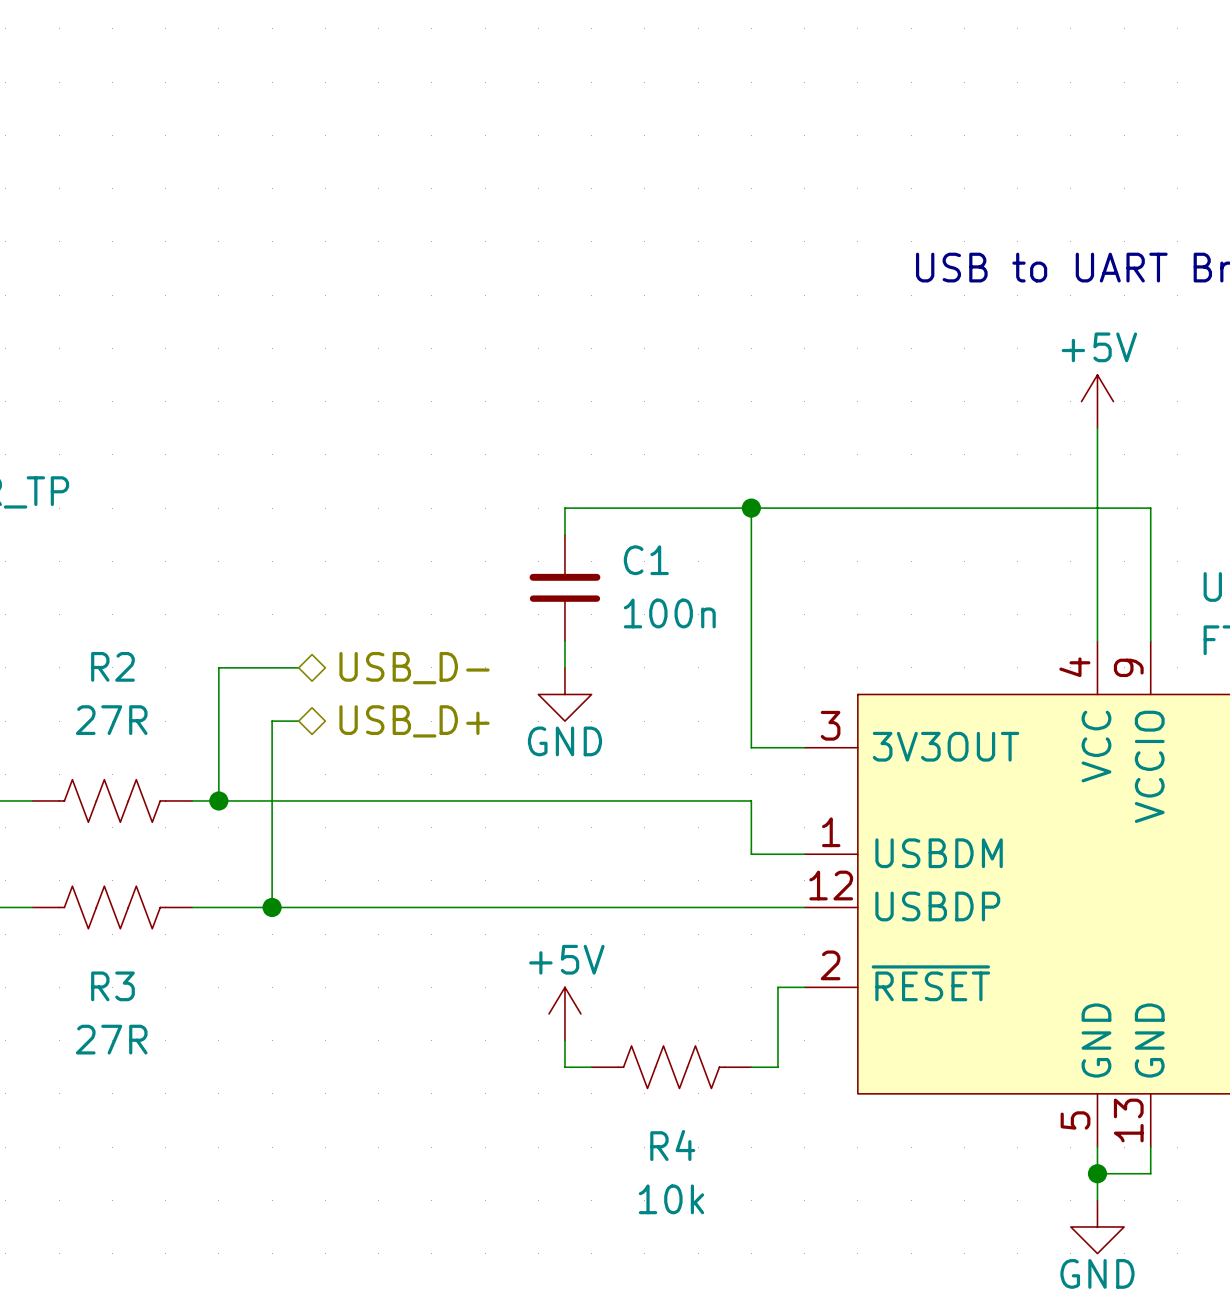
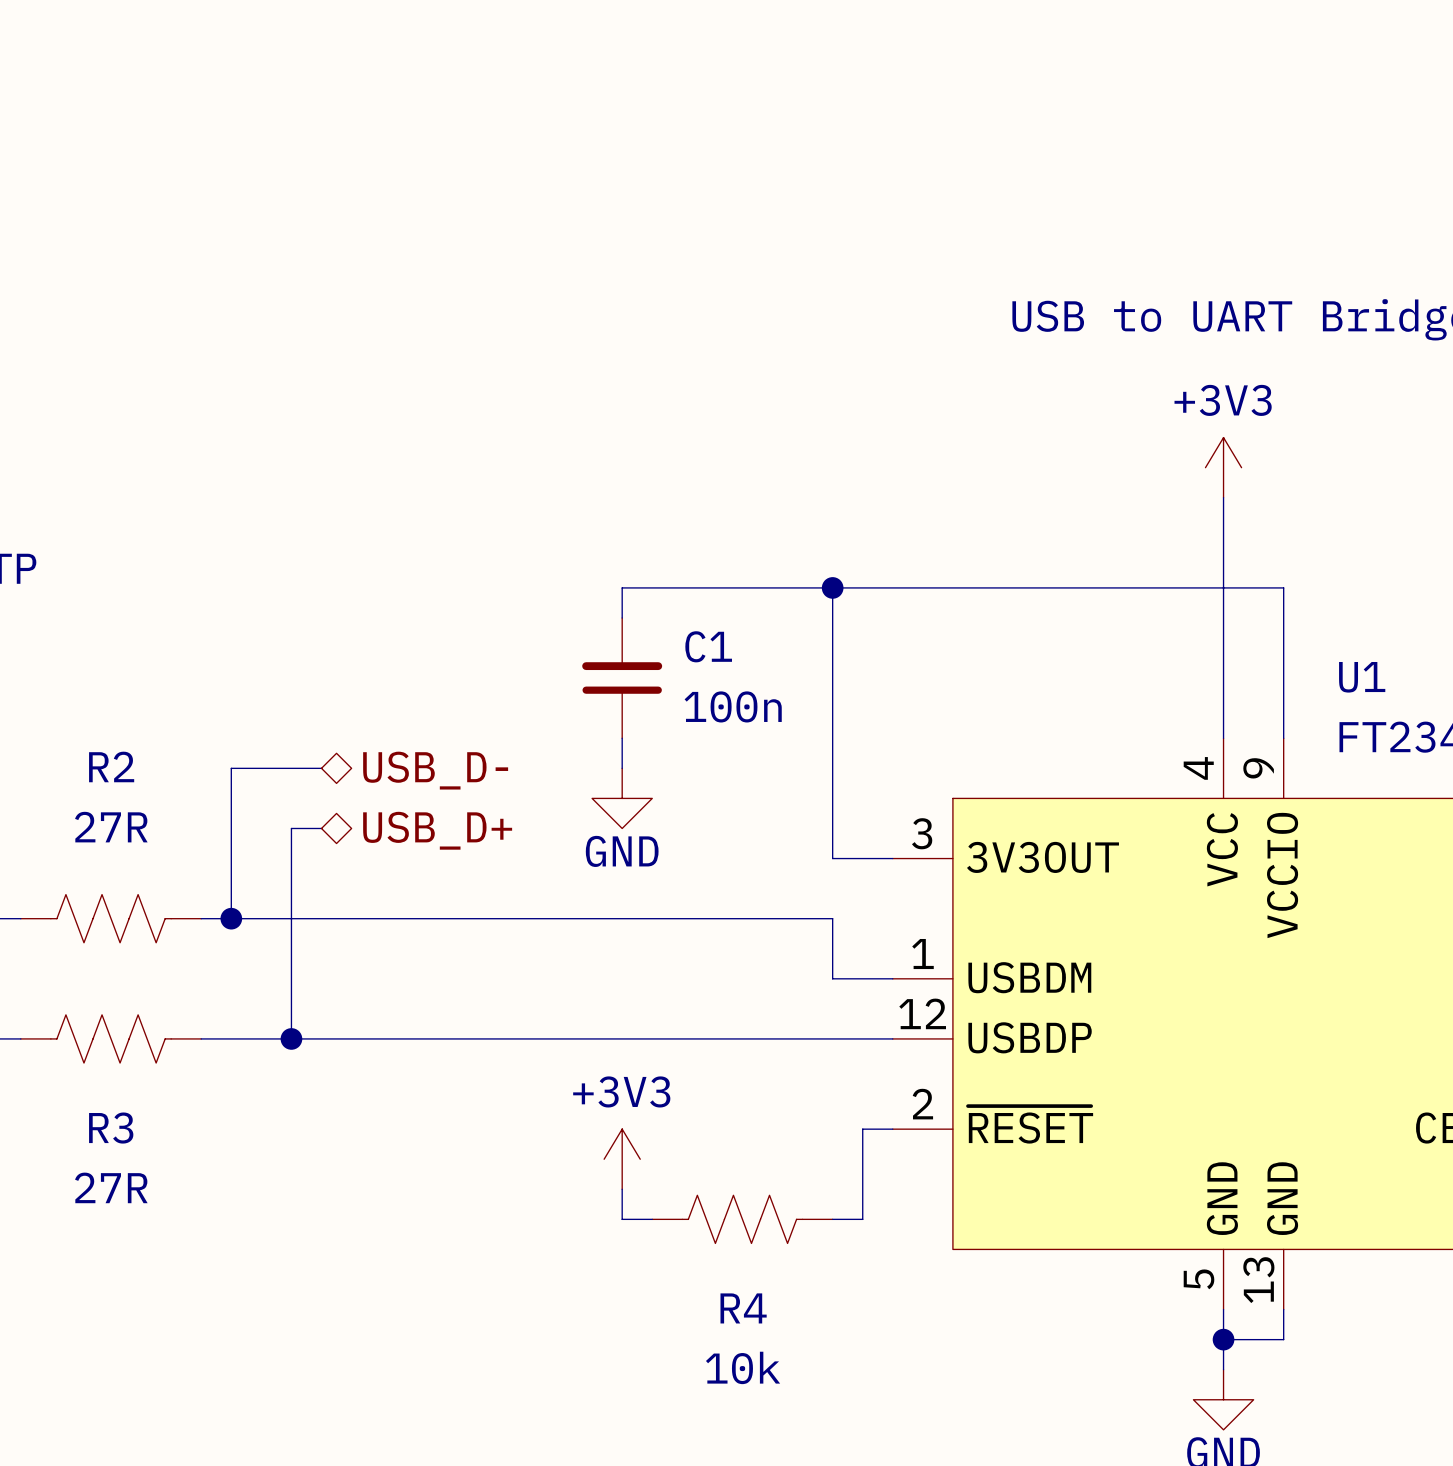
power symbol: +5V (1097, 401) -> +3V3 (1223, 467)
power symbol: +5V (564, 1013) -> +3V3 (622, 1159)

